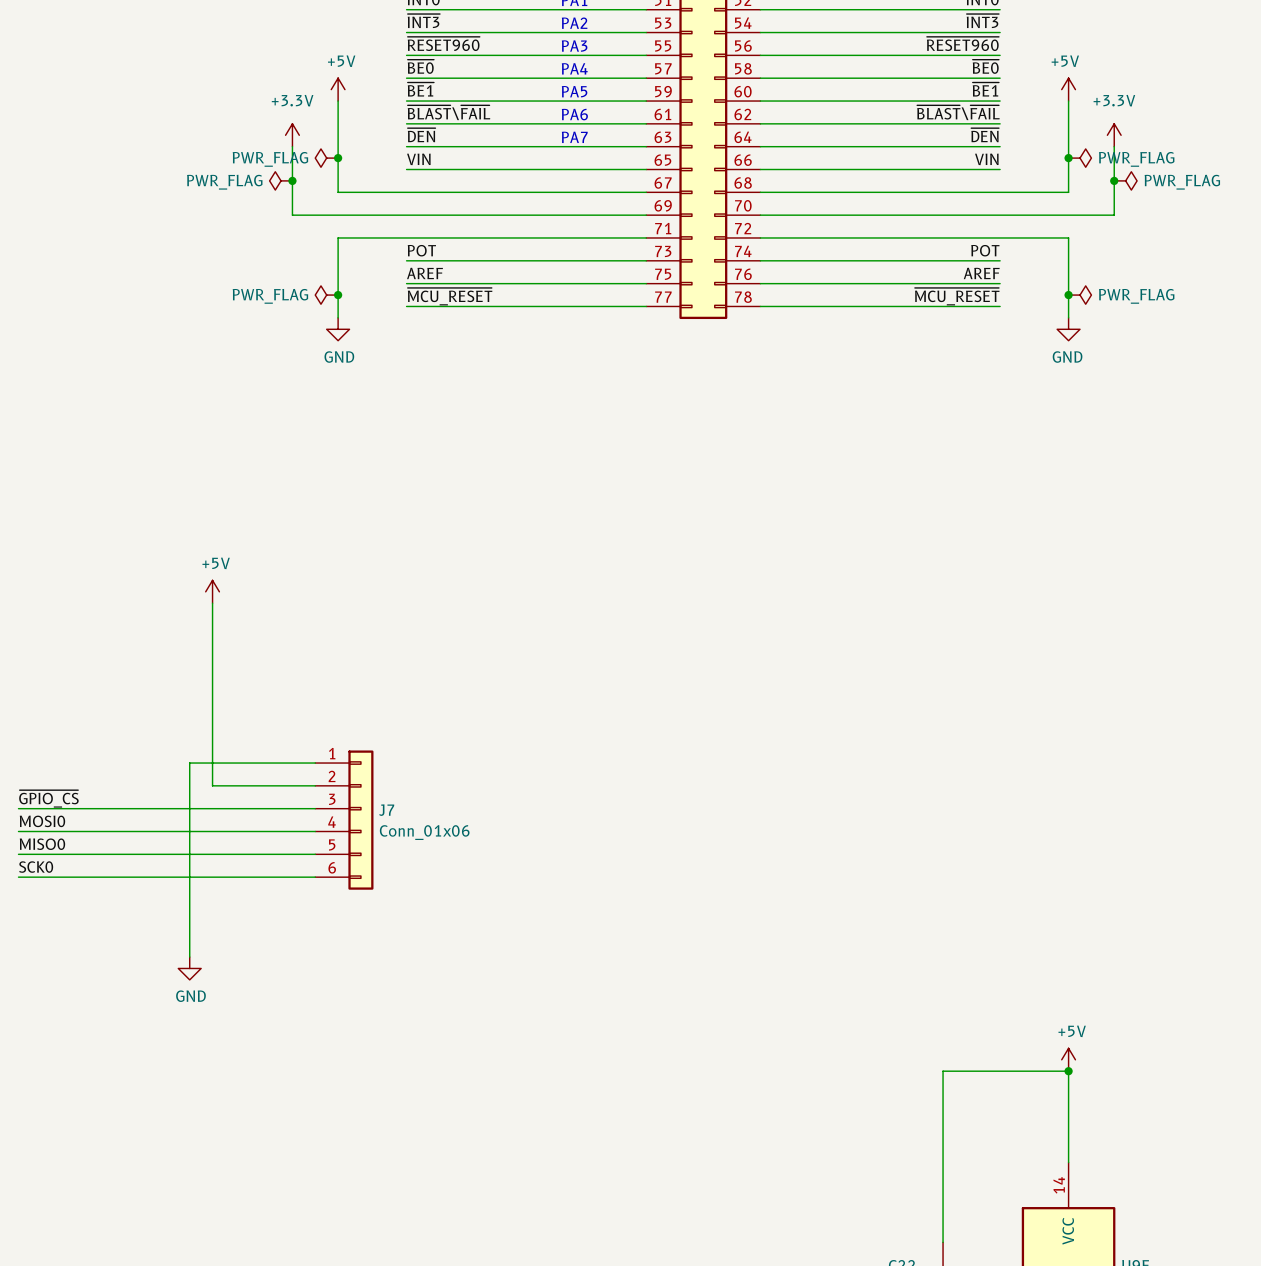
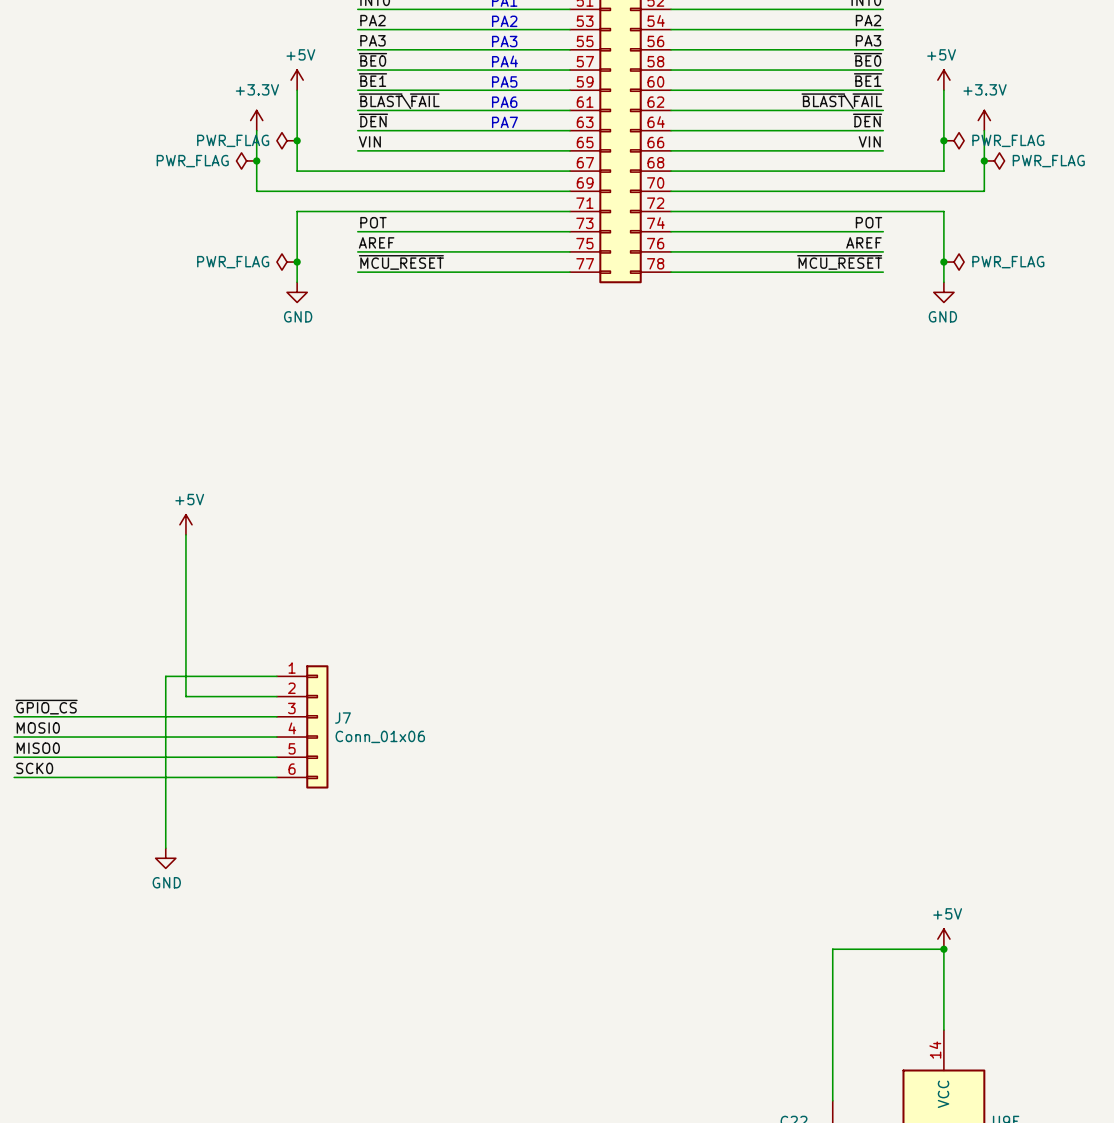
label: ~{INT3} (423, 21) -> PA2 (373, 20)
label: ~{INT3} (982, 21) -> PA2 (868, 20)
label: ~{RESET960} (443, 43) -> PA3 (373, 40)
label: ~{RESET960} (962, 43) -> PA3 (868, 40)

